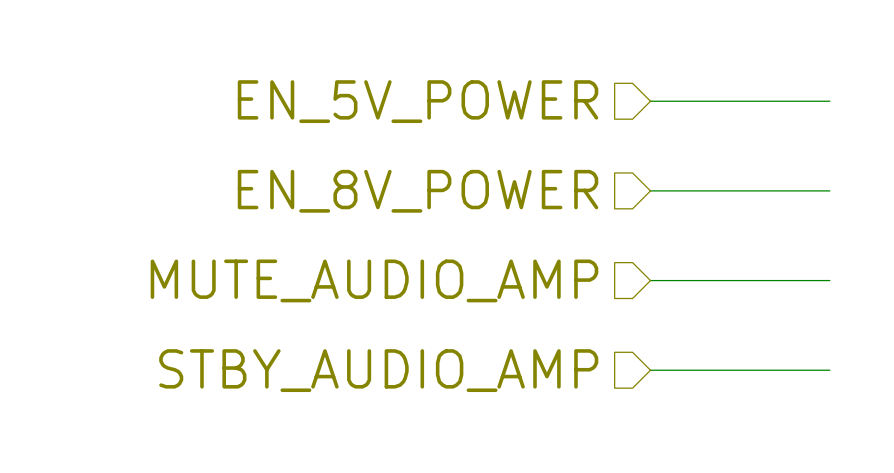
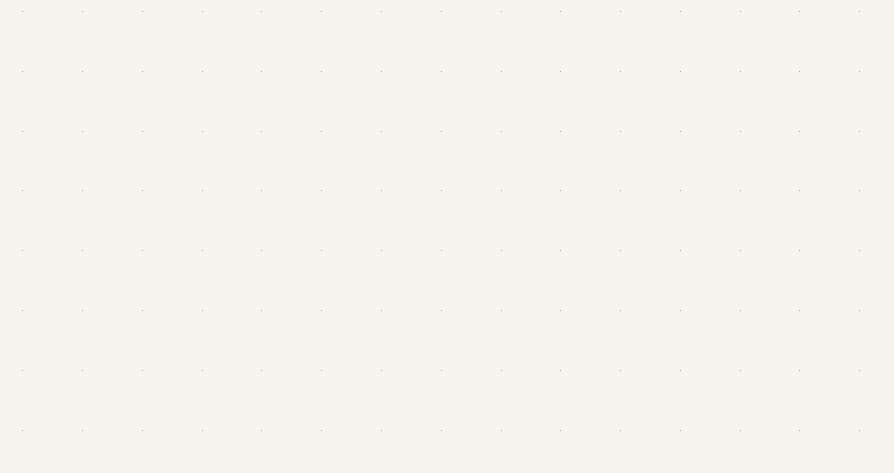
hierarchical label: EN_5V_POWER (418, 101) -> none
wire: (650, 101) (829, 101) -> none
wire: (650, 190) (829, 190) -> none
hierarchical label: EN_8V_POWER (418, 191) -> none
hierarchical label: MUTE_AUDIO_AMP (374, 280) -> none
wire: (650, 280) (829, 280) -> none
hierarchical label: STBY_AUDIO_AMP (378, 370) -> none
wire: (650, 370) (829, 370) -> none

